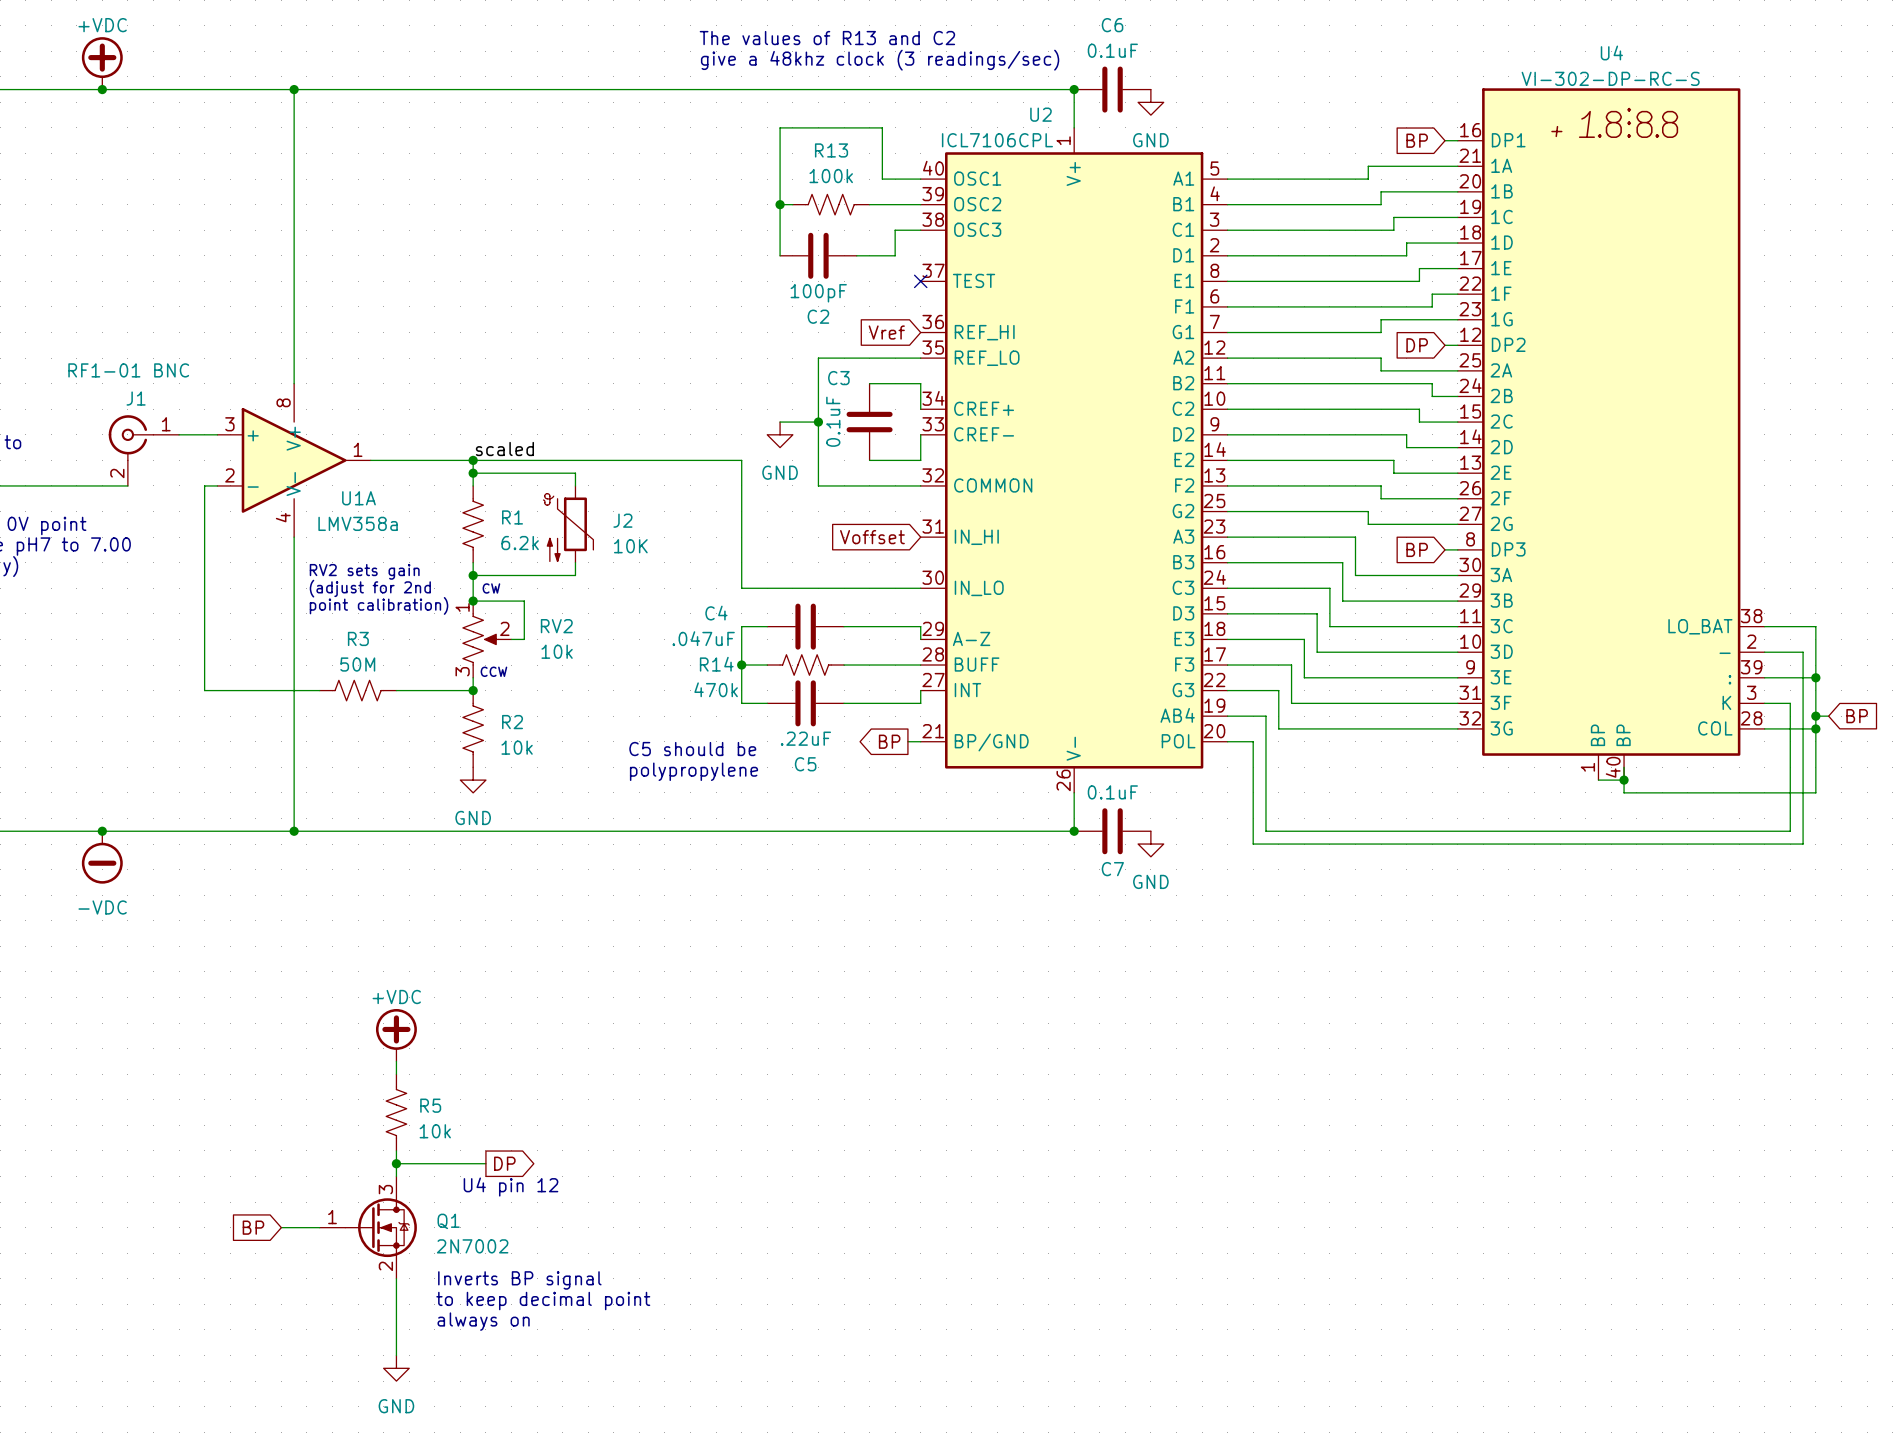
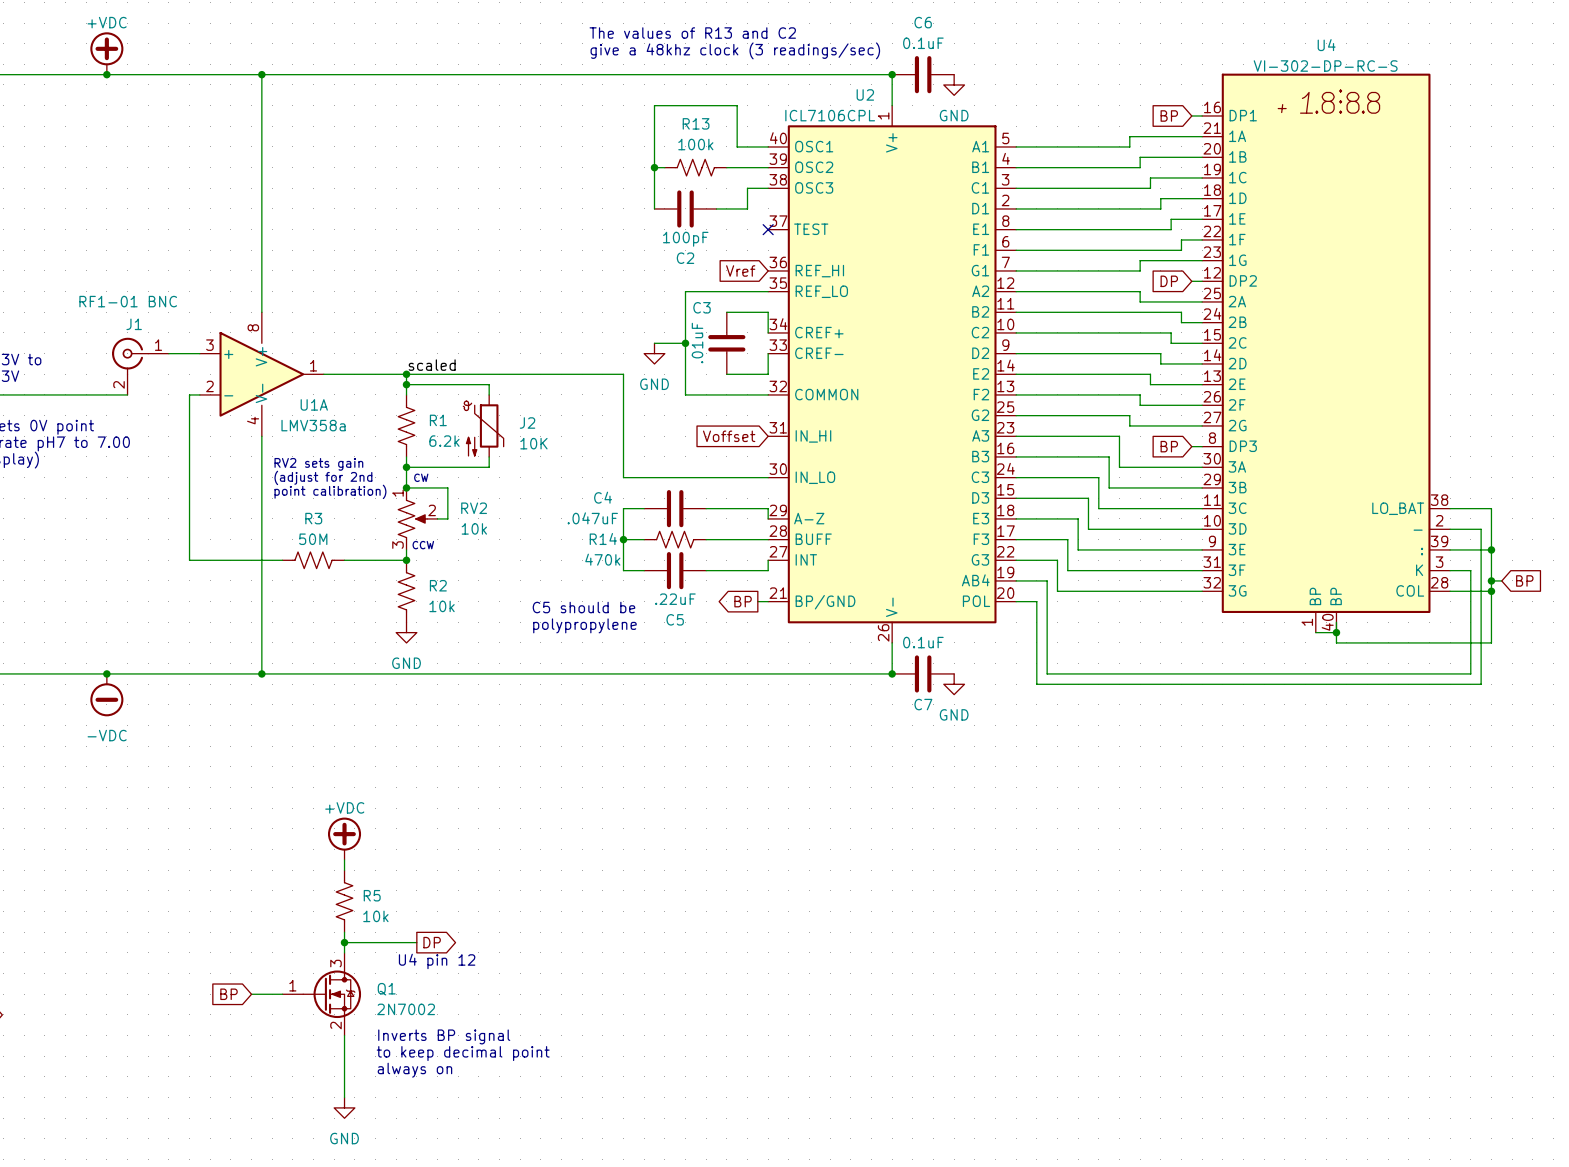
C3 value: 0.1uF (833, 421) -> .01uF (697, 343)

